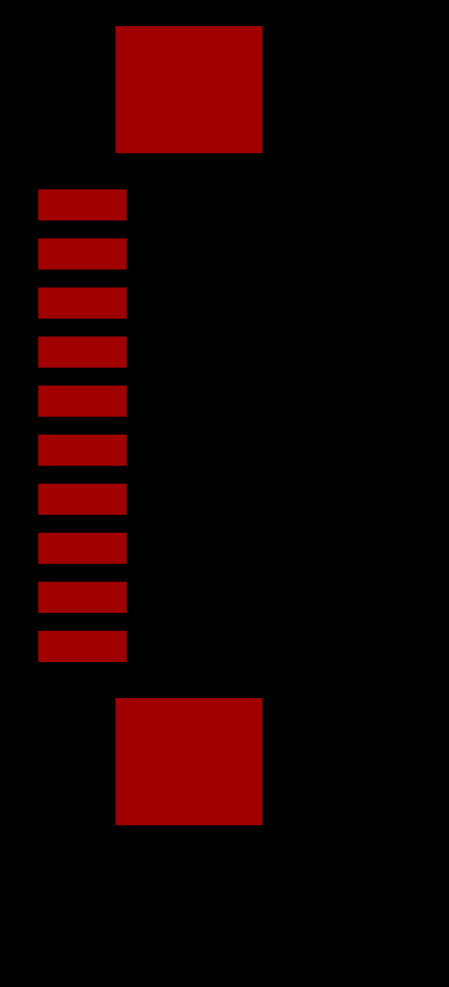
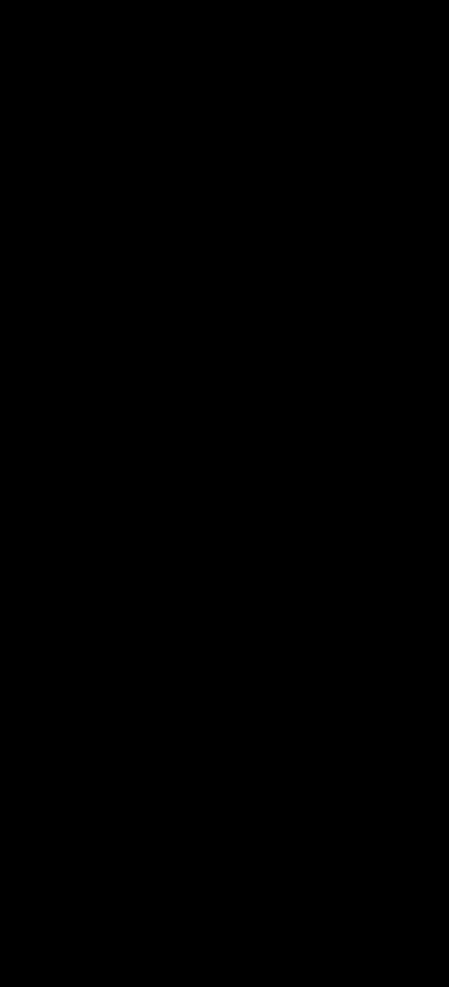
part: (150, 425) -> none

